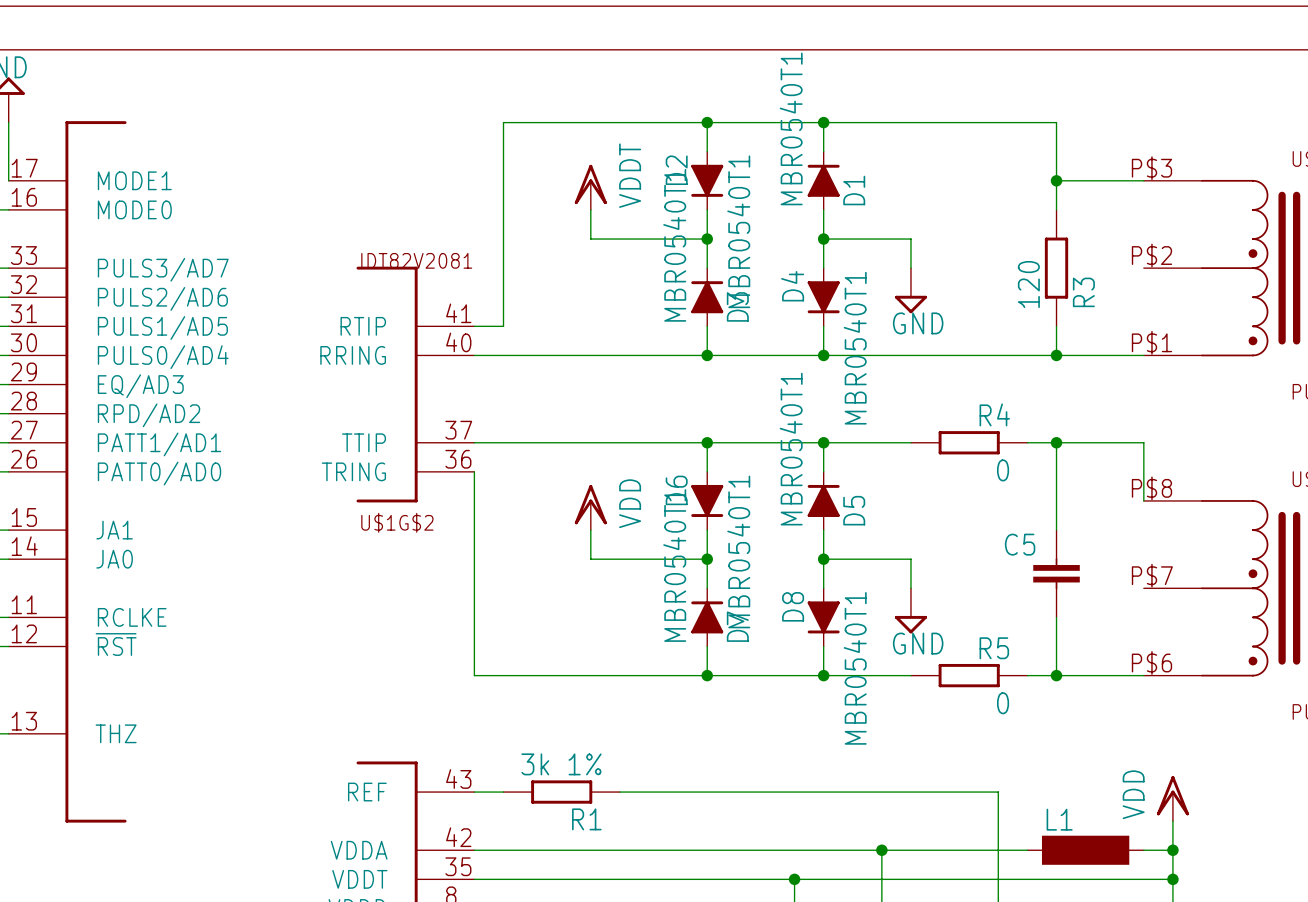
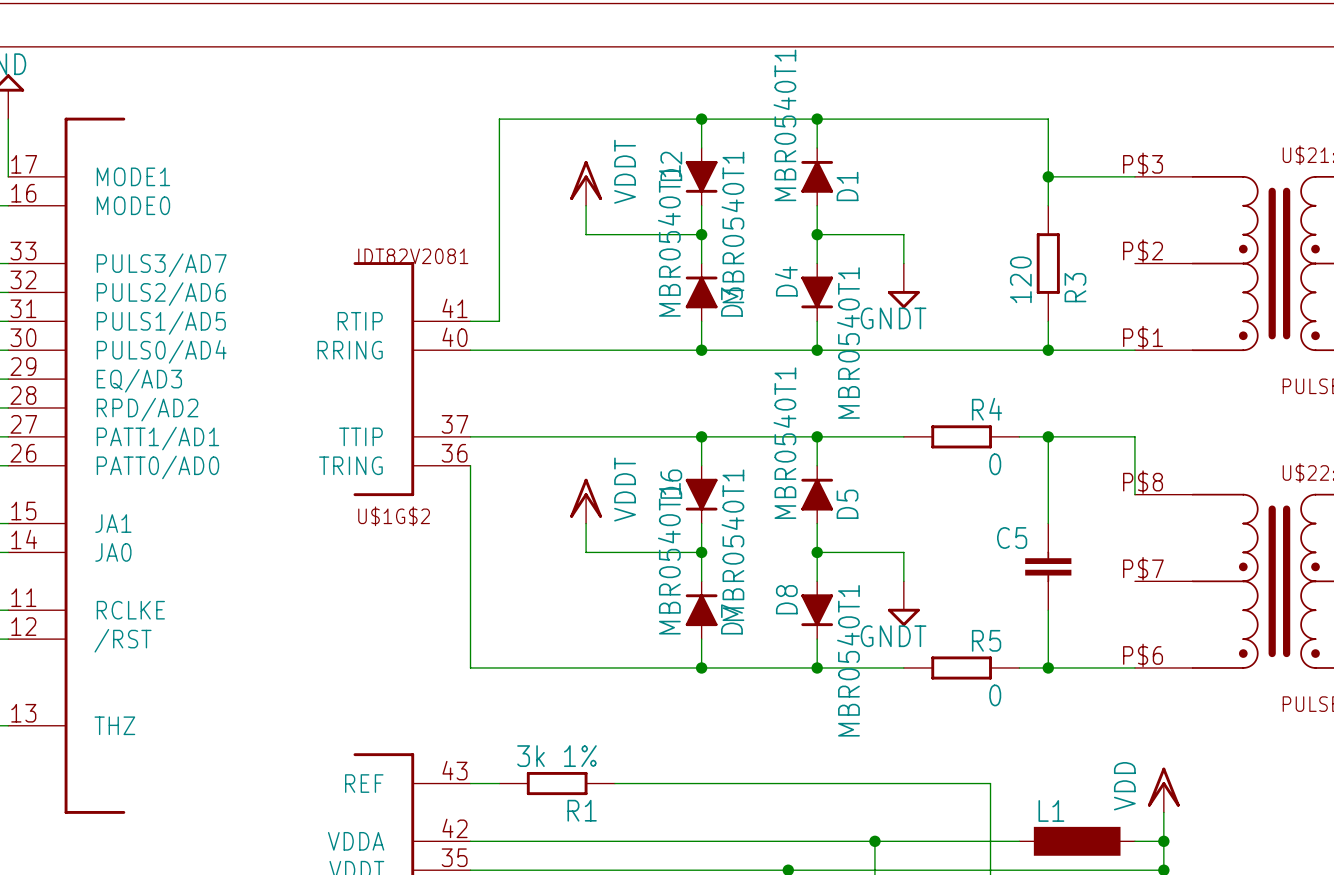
power symbol: GND (910, 290) -> GNDT (903, 285)
power symbol: VDD (590, 507) -> VDDT (586, 501)
power symbol: GND (910, 610) -> GNDT (903, 603)
part pin name: ~{RST} (116, 644) -> /RST (123, 640)

